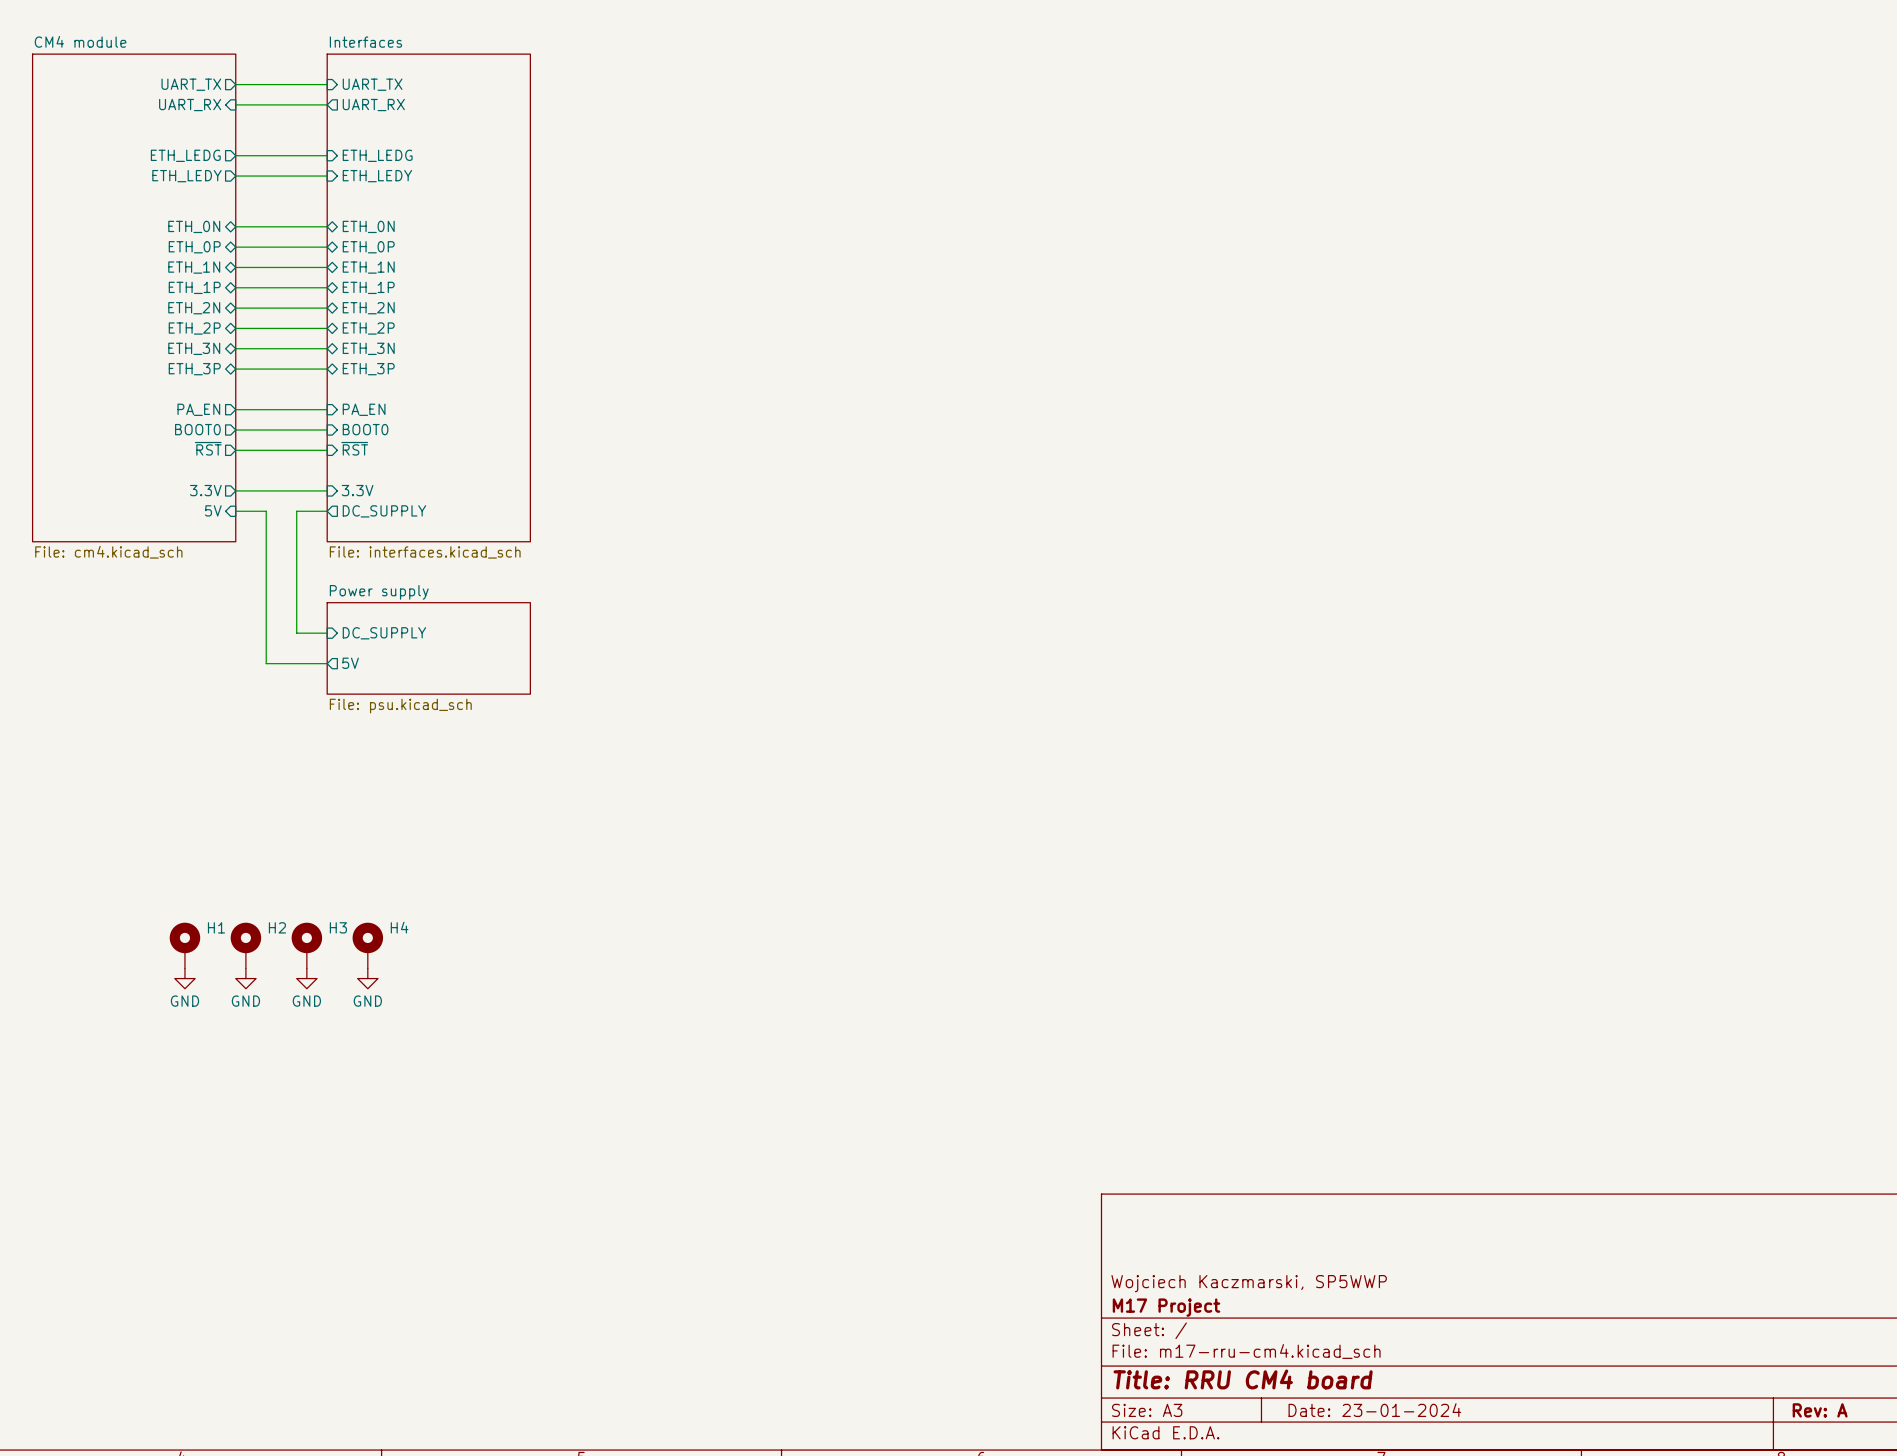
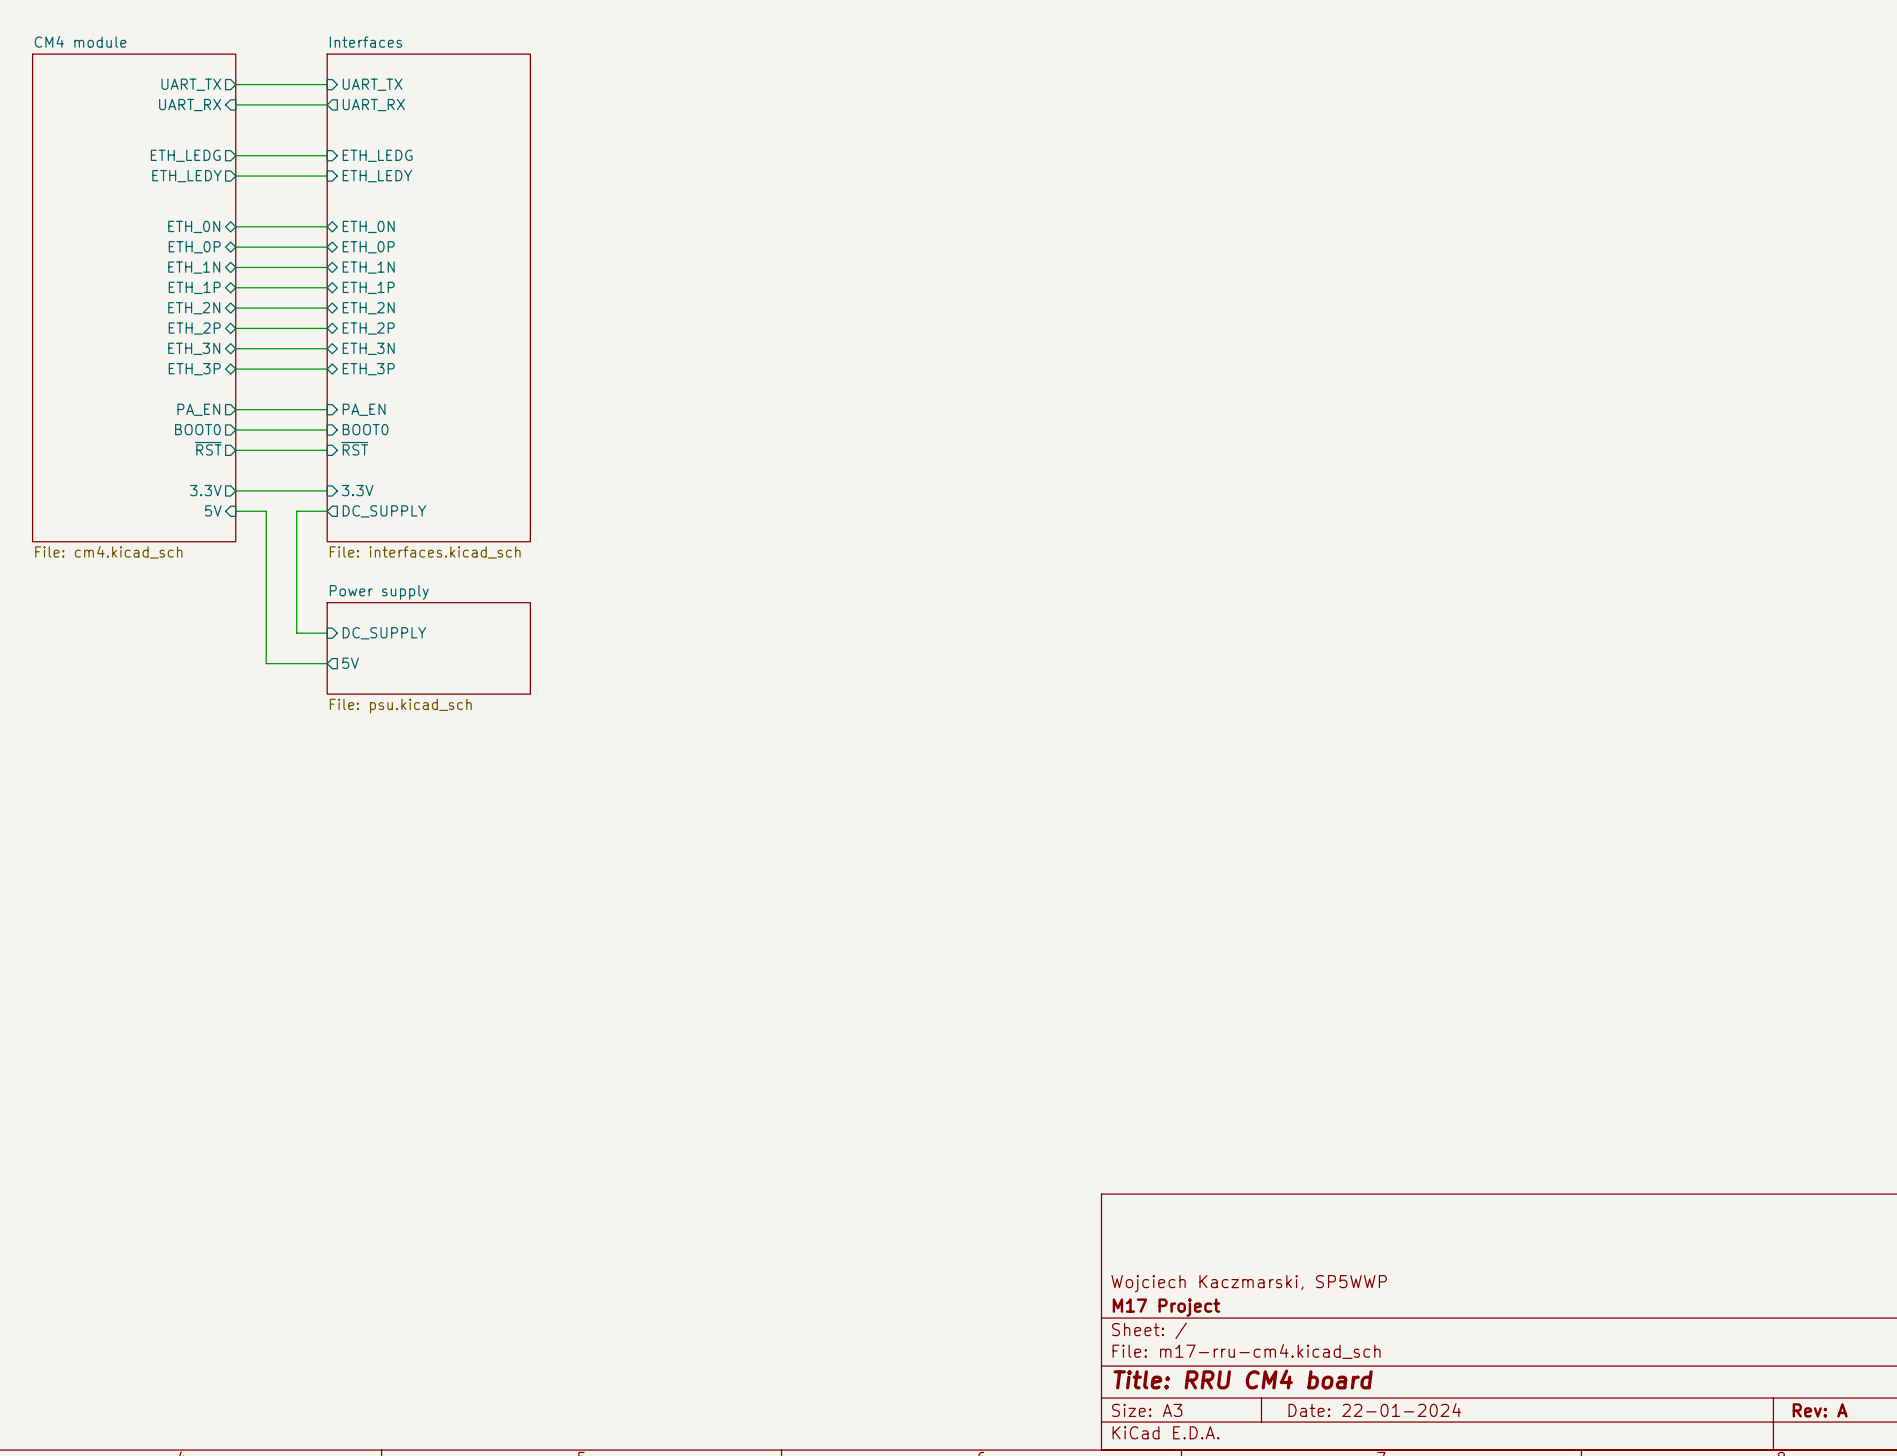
H1: (184, 945) -> none
H2: (245, 945) -> none
H3: (306, 945) -> none
H4: (367, 945) -> none
power symbol: GND (184, 978) -> none
power symbol: GND (245, 978) -> none
power symbol: GND (306, 978) -> none
power symbol: GND (367, 978) -> none
title block: Date: 23-01-2024 (1374, 1410) -> Date: 22-01-2024 (1374, 1410)

